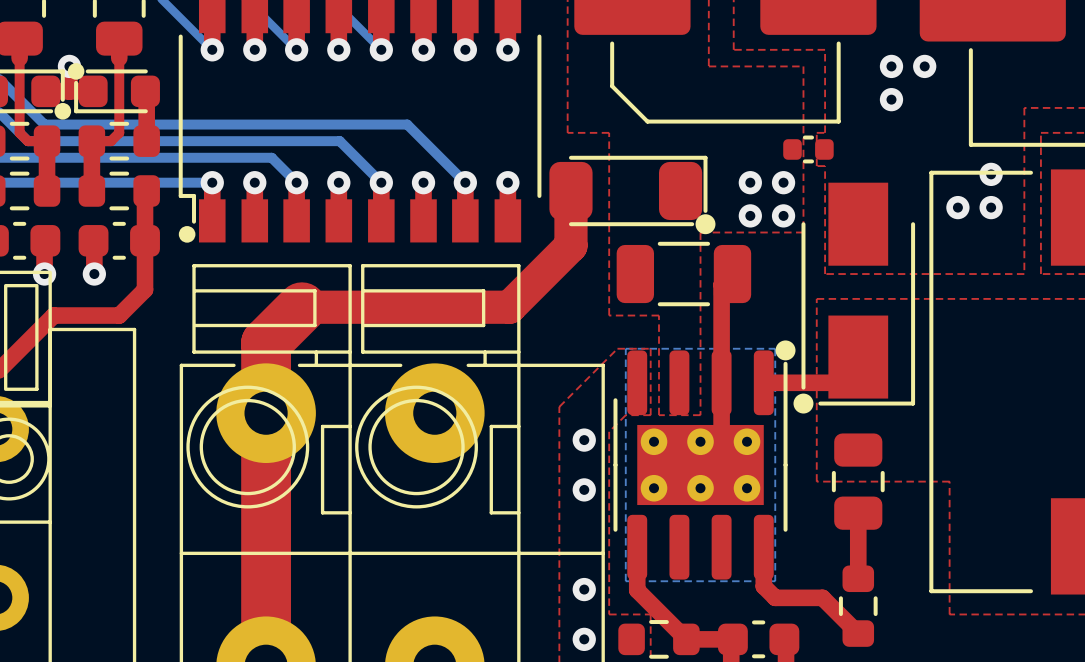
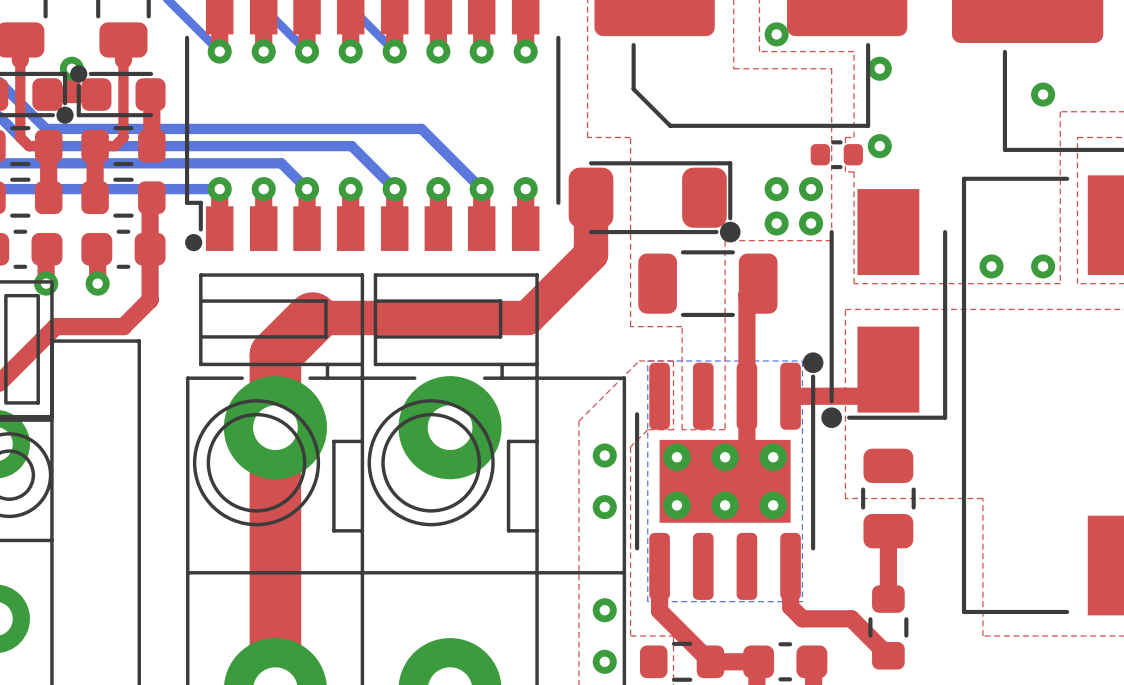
via: none -> (776, 34)
via: none -> (879, 68)
via: (891, 66) -> none
via: (924, 66) -> none
via: none -> (1043, 94)
via: (891, 99) -> none
via: none -> (879, 146)
via: (991, 174) -> none
via: (957, 207) -> none
via: (991, 207) -> none
via: none -> (991, 266)
via: none -> (1043, 266)

